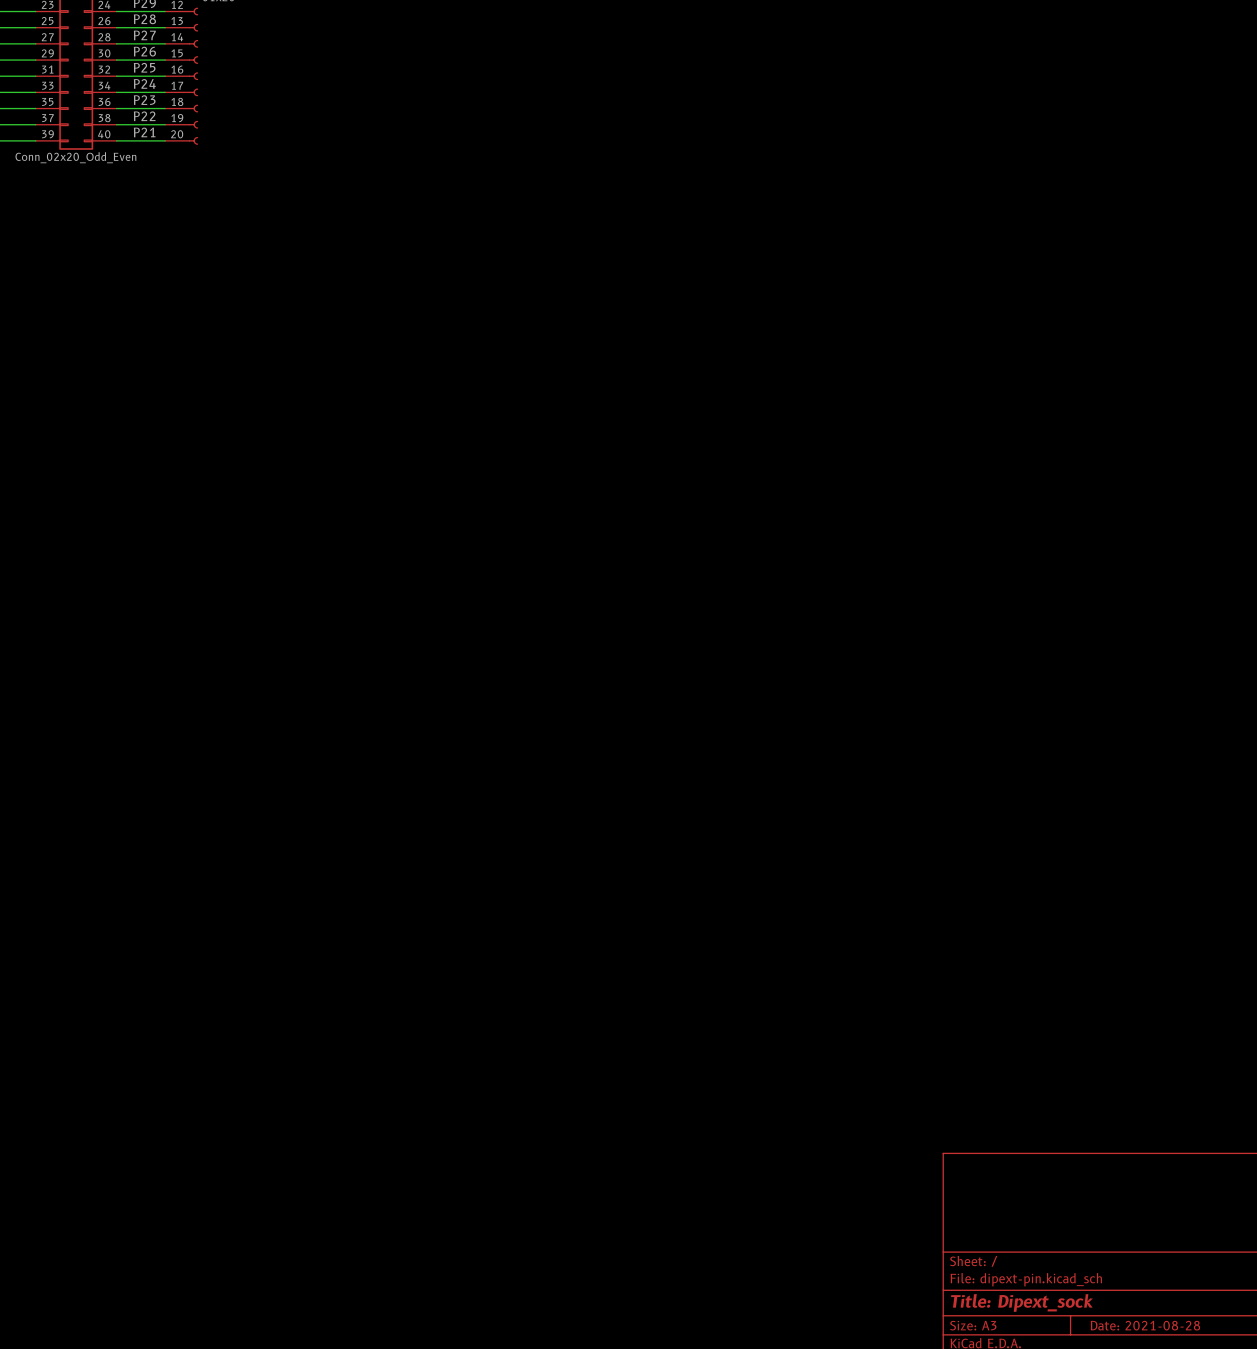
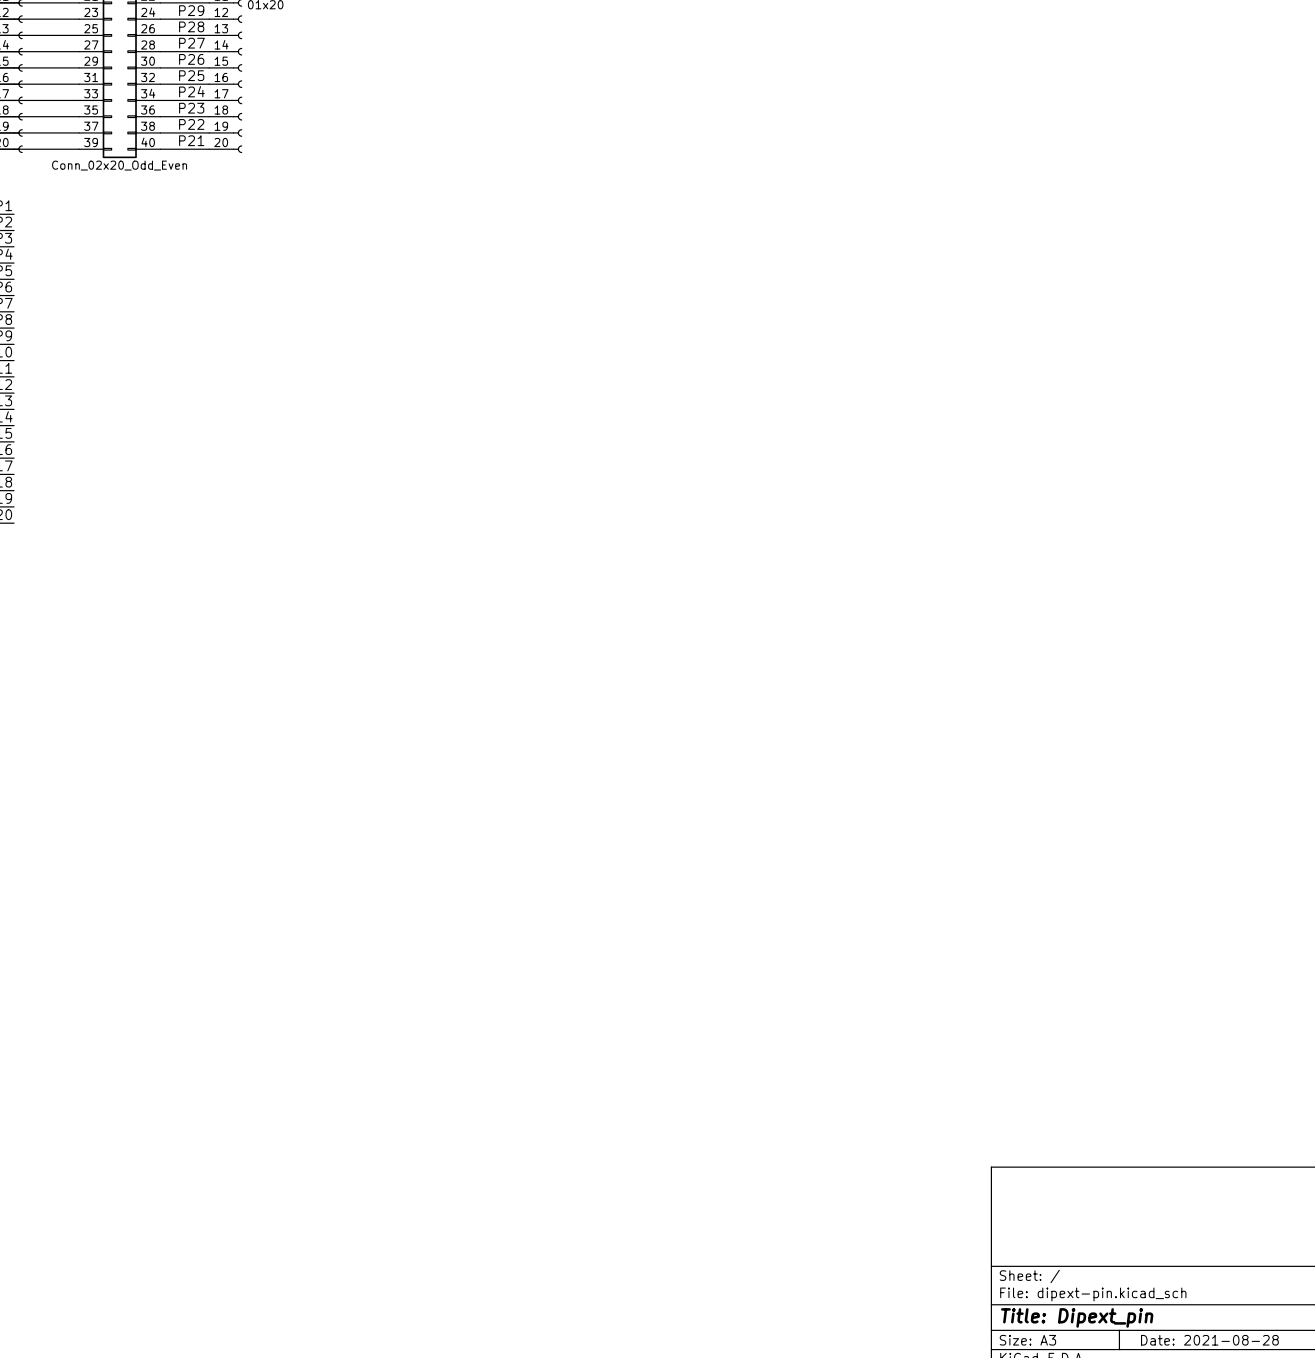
title block: Title: Dipext_sock (1021, 1302) -> Title: Dipext_pin (1077, 1317)

